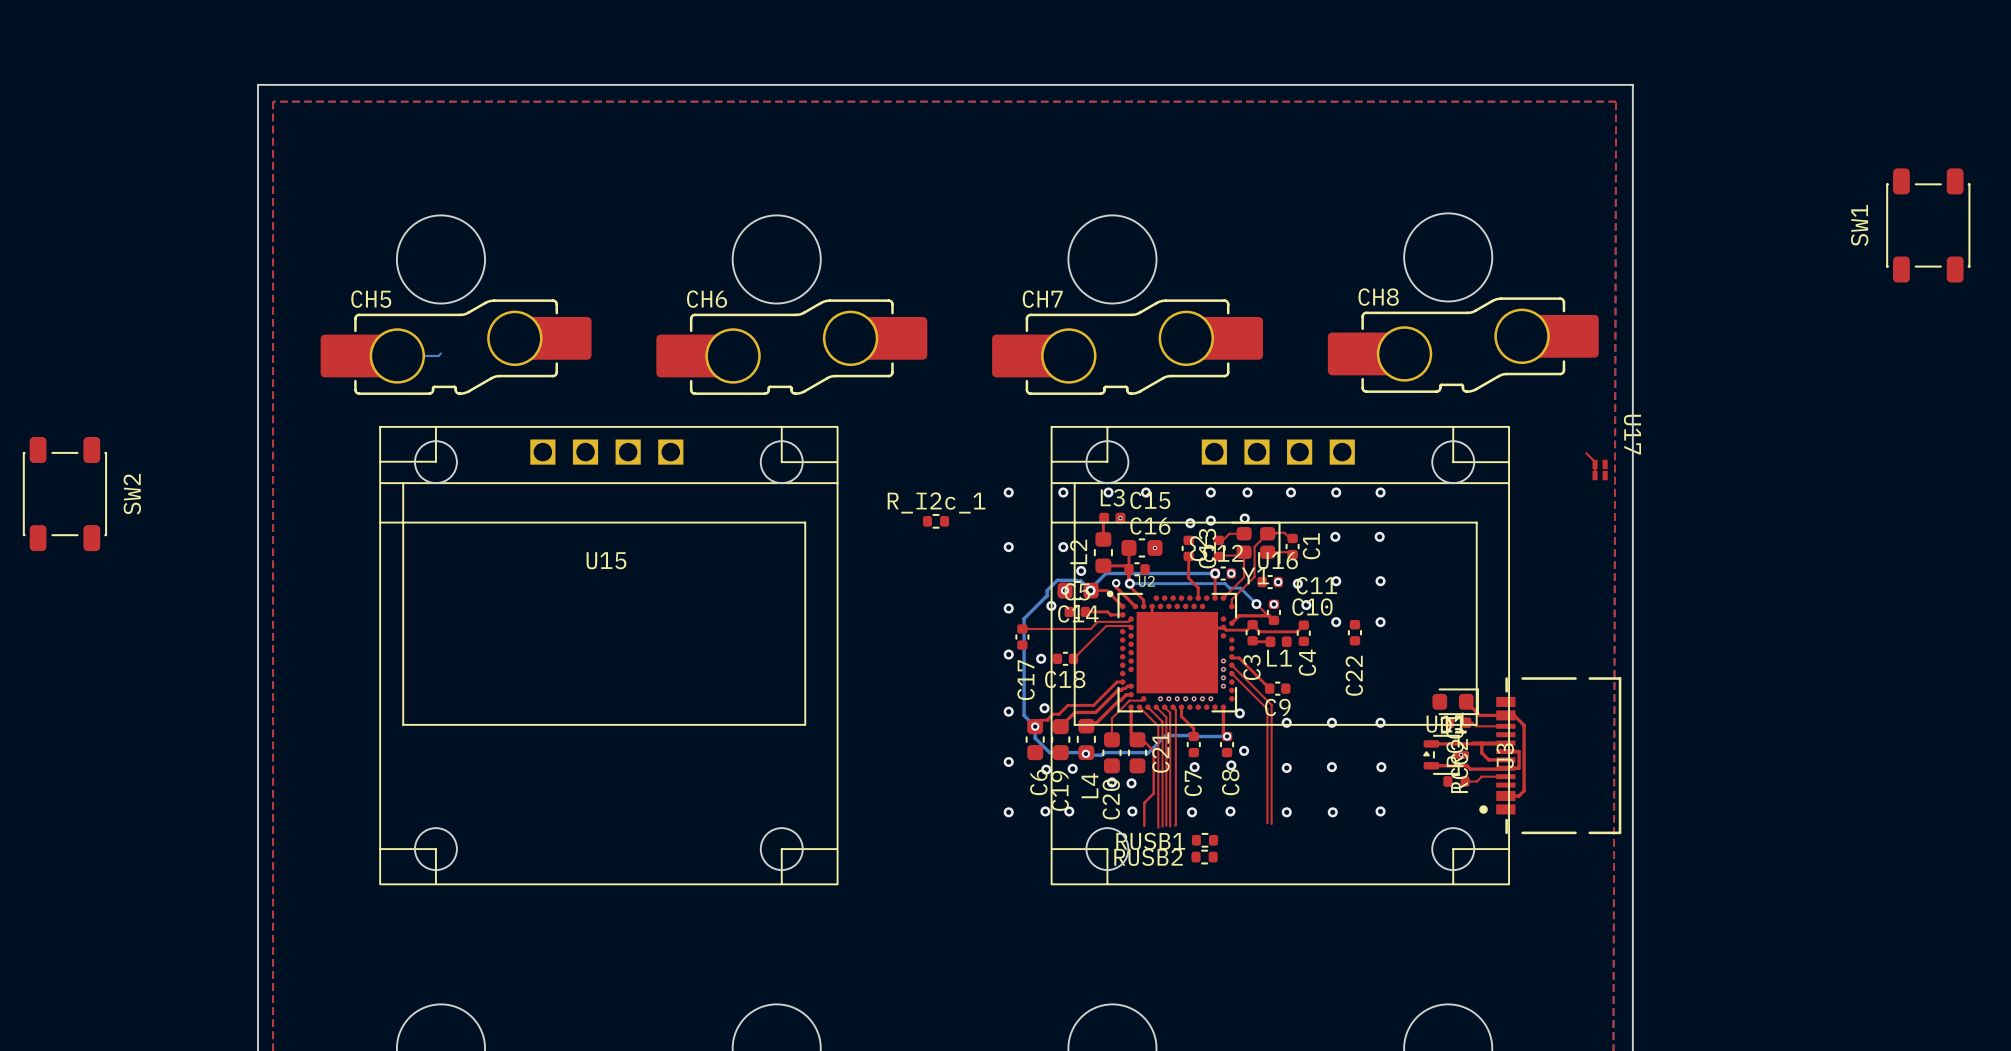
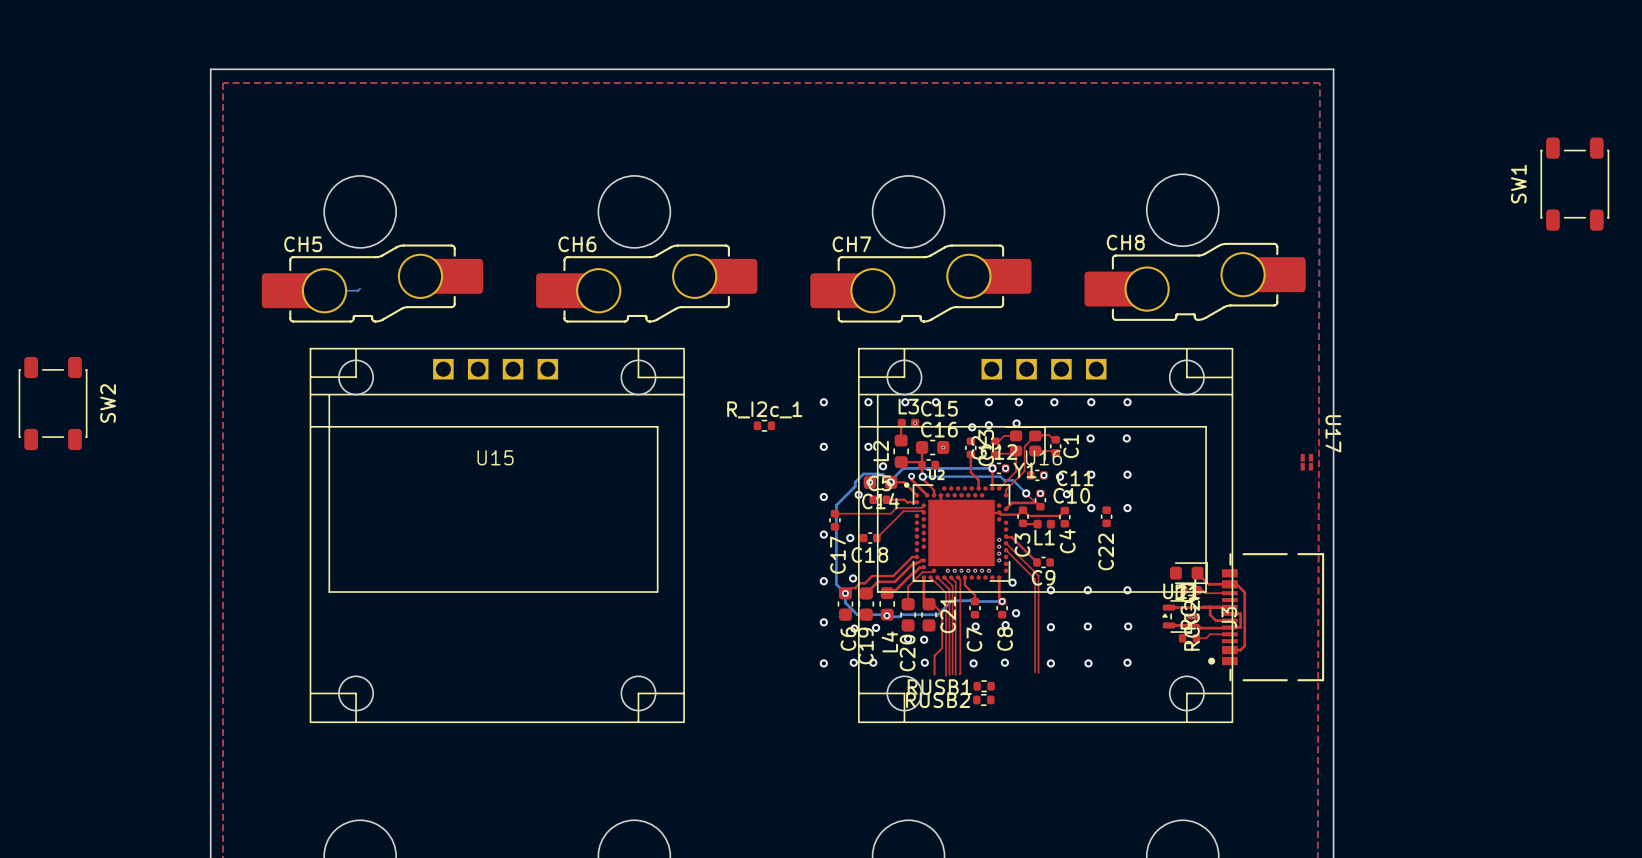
top track: (1586, 453) (1595, 461) (1595, 475) -> none
U17 position: (1600, 470) -> (1306, 462)

